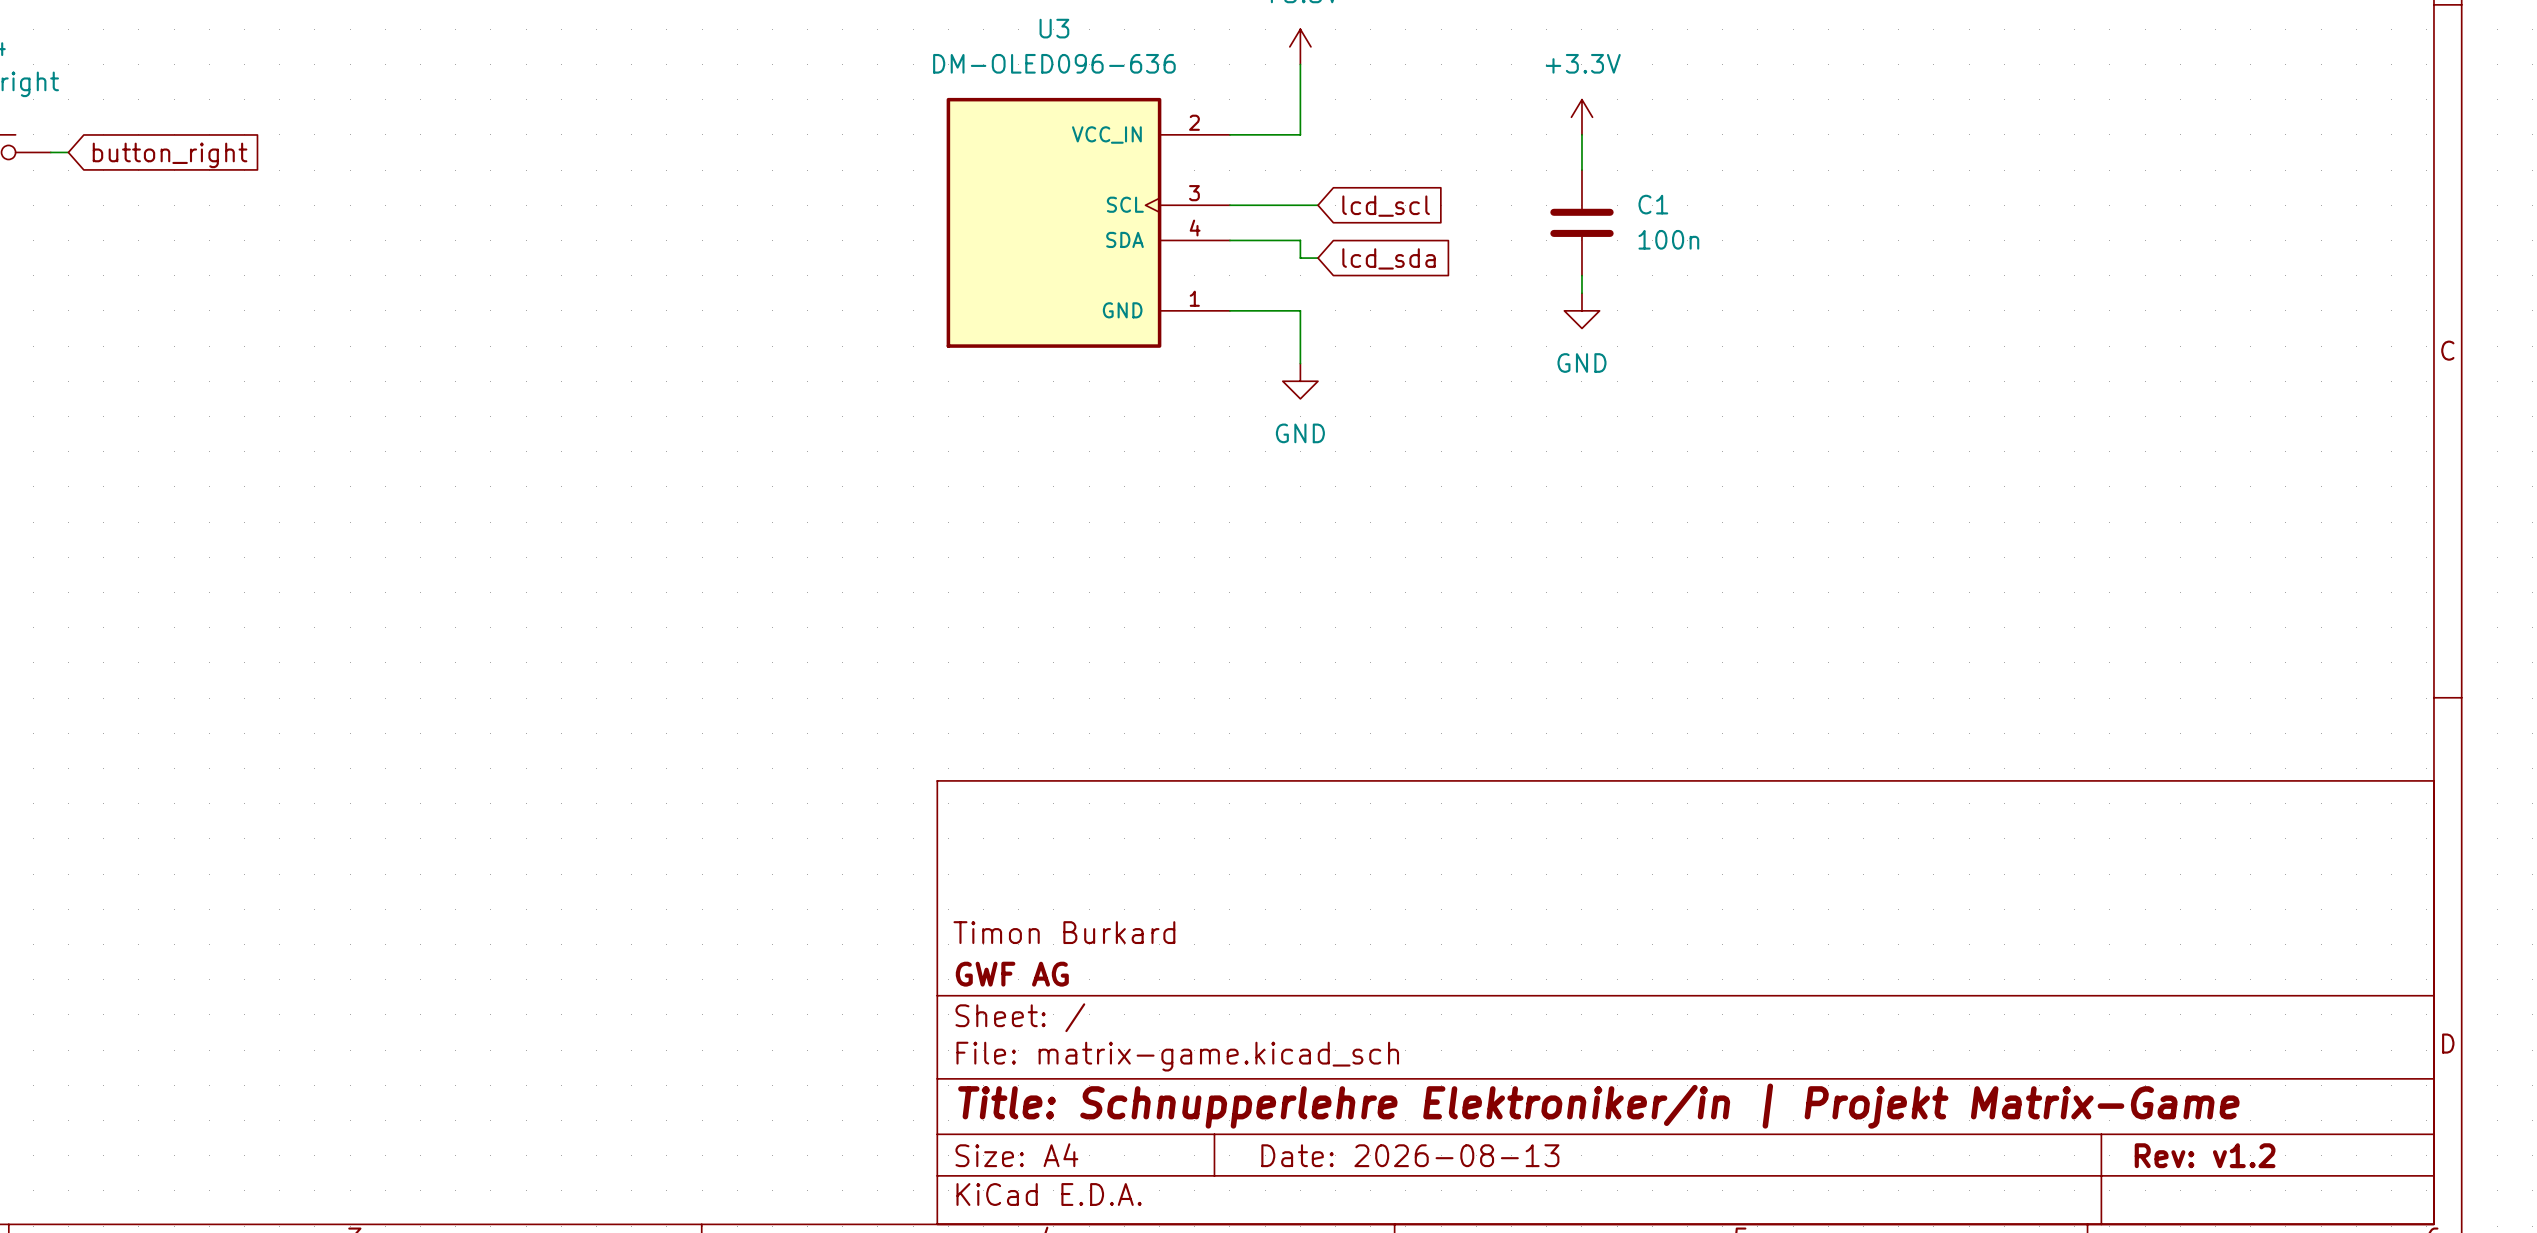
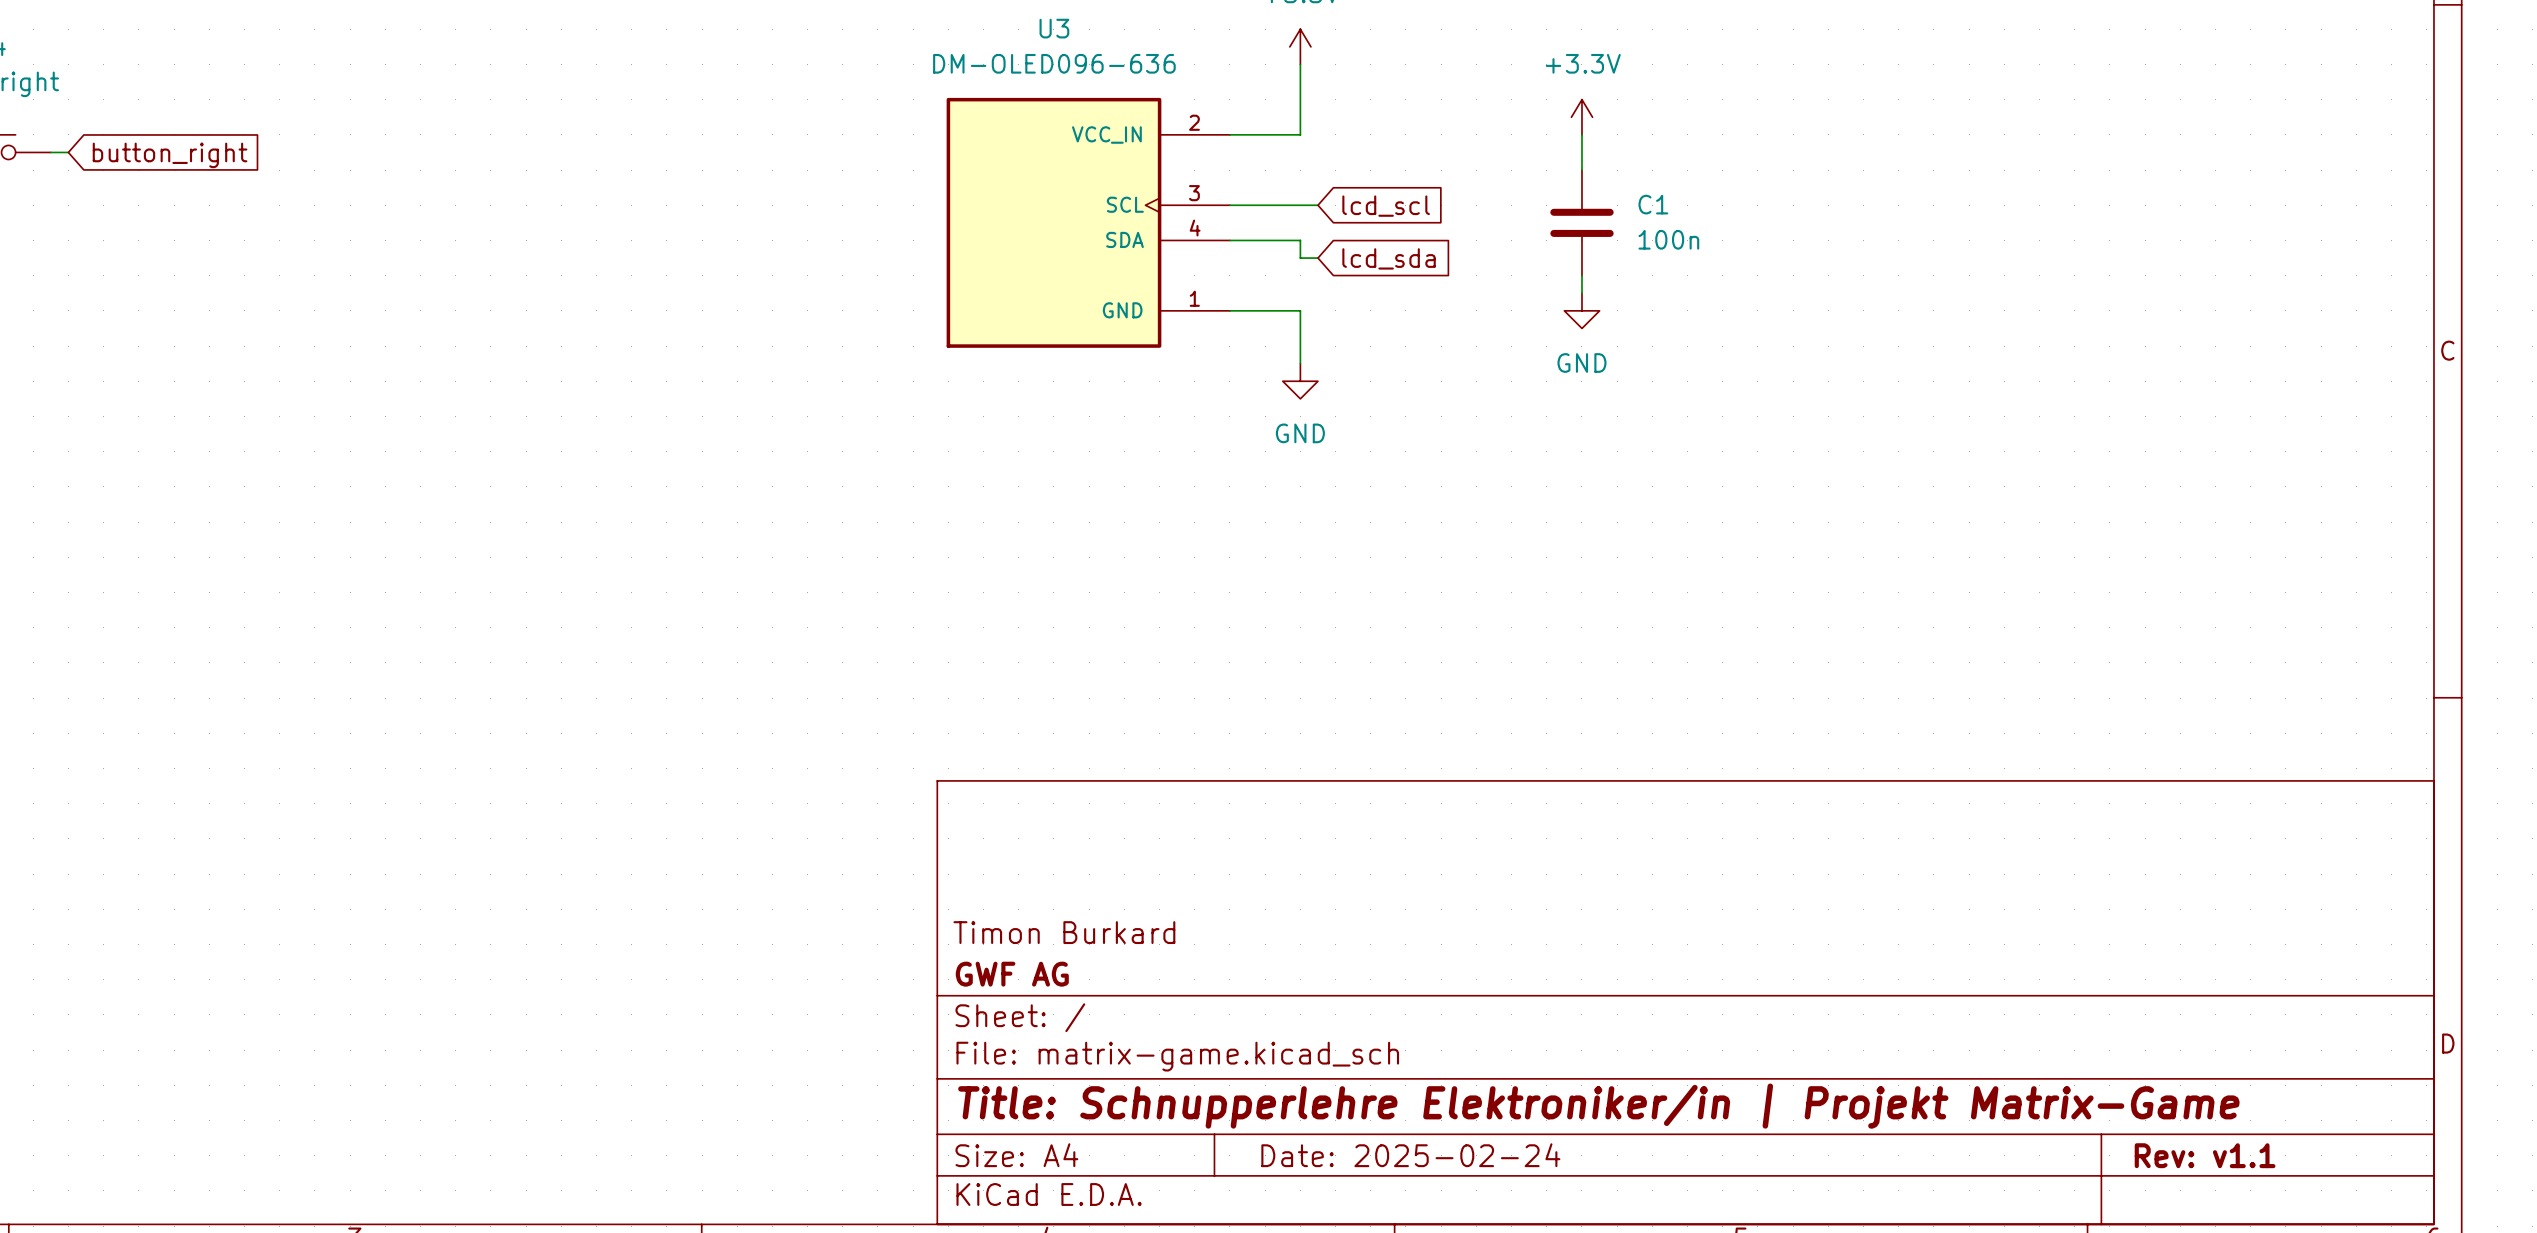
title block: Date: 2026-08-13 (1410, 1155) -> Date: 2025-02-24 (1410, 1155)
title block: Rev: v1.2 (2205, 1155) -> Rev: v1.1 (2205, 1155)

